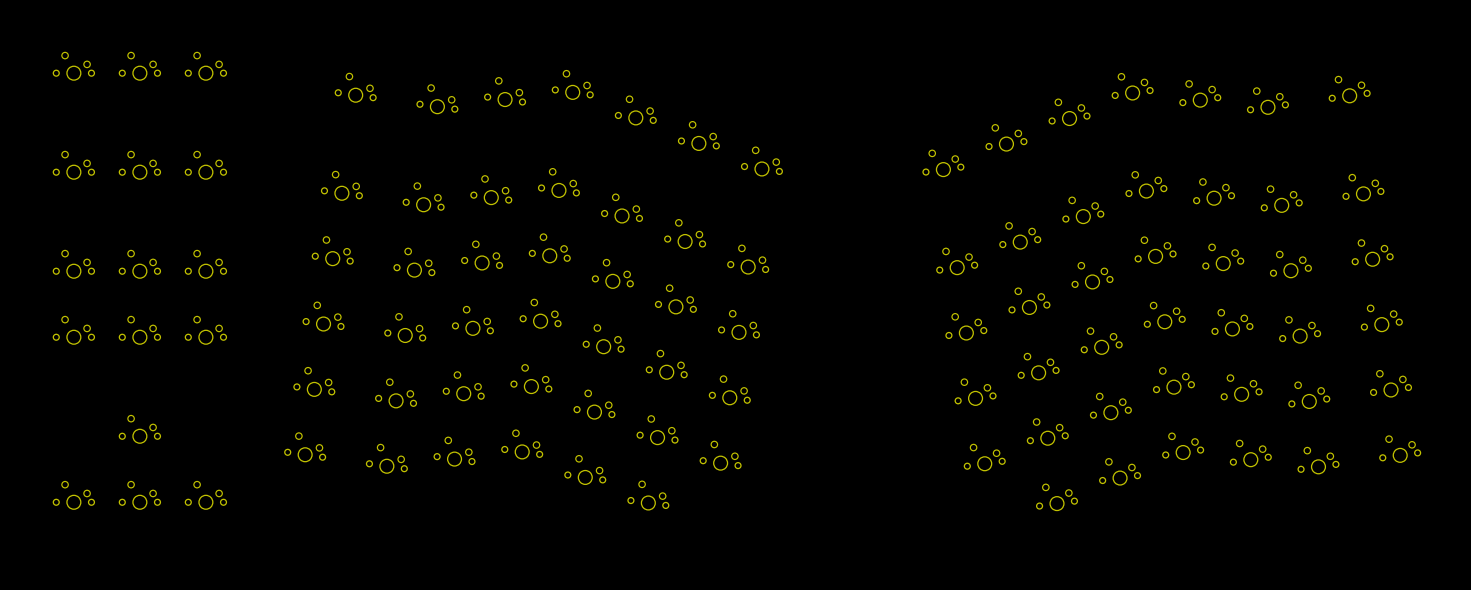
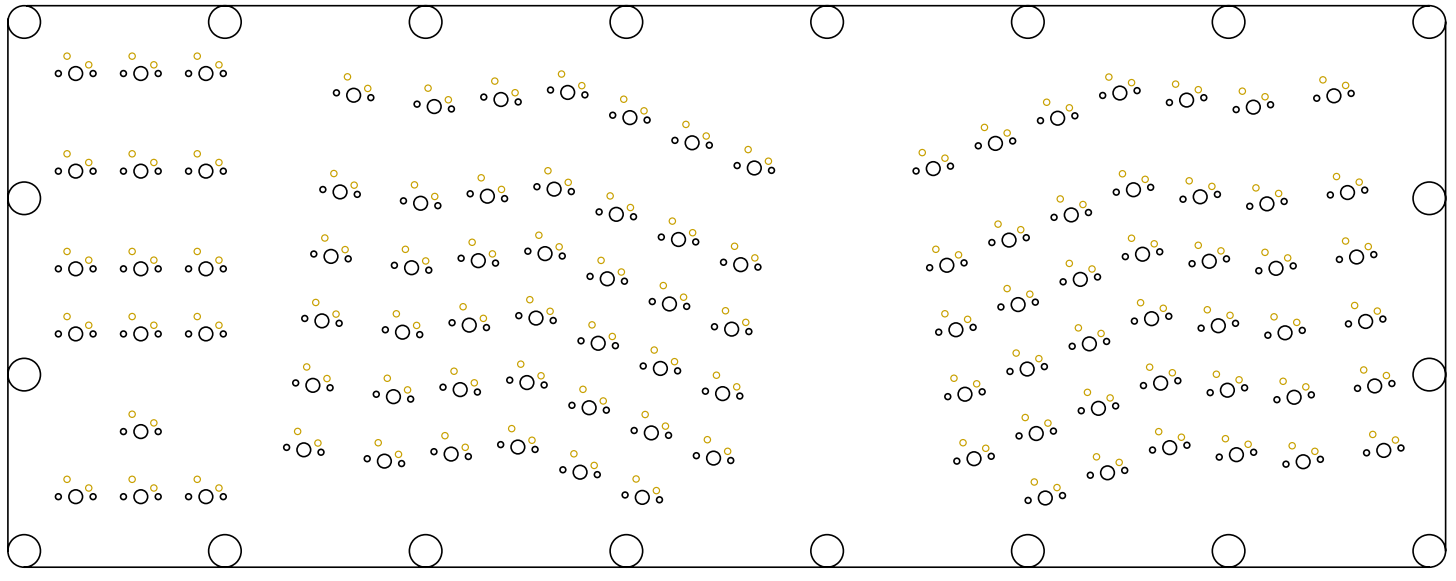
round board edge: none -> [7, 5, 41, 39]
round board edge: none -> [208, 5, 242, 39]
round board edge: none -> [409, 5, 443, 39]
round board edge: none -> [609, 5, 643, 39]
round board edge: none -> [810, 5, 844, 39]
round board edge: none -> [1011, 5, 1045, 39]
round board edge: none -> [1212, 5, 1246, 39]
round board edge: none -> [1412, 5, 1446, 39]
board edge: none -> (1429, 5) (26, 5)
board edge: none -> (7, 19) (7, 550)
board edge: none -> (1445, 21) (1445, 550)
round board edge: none -> [7, 181, 41, 215]
round board edge: none -> [1412, 181, 1446, 215]
round board edge: none -> [7, 358, 41, 392]
round board edge: none -> [1412, 358, 1446, 392]
round board edge: none -> [7, 534, 41, 568]
round board edge: none -> [208, 534, 242, 568]
round board edge: none -> [409, 534, 443, 568]
round board edge: none -> [609, 534, 643, 568]
round board edge: none -> [810, 534, 844, 568]
round board edge: none -> [1011, 534, 1045, 568]
round board edge: none -> [1212, 534, 1246, 568]
round board edge: none -> [1412, 534, 1446, 568]
board edge: none -> (1429, 567) (24, 567)

